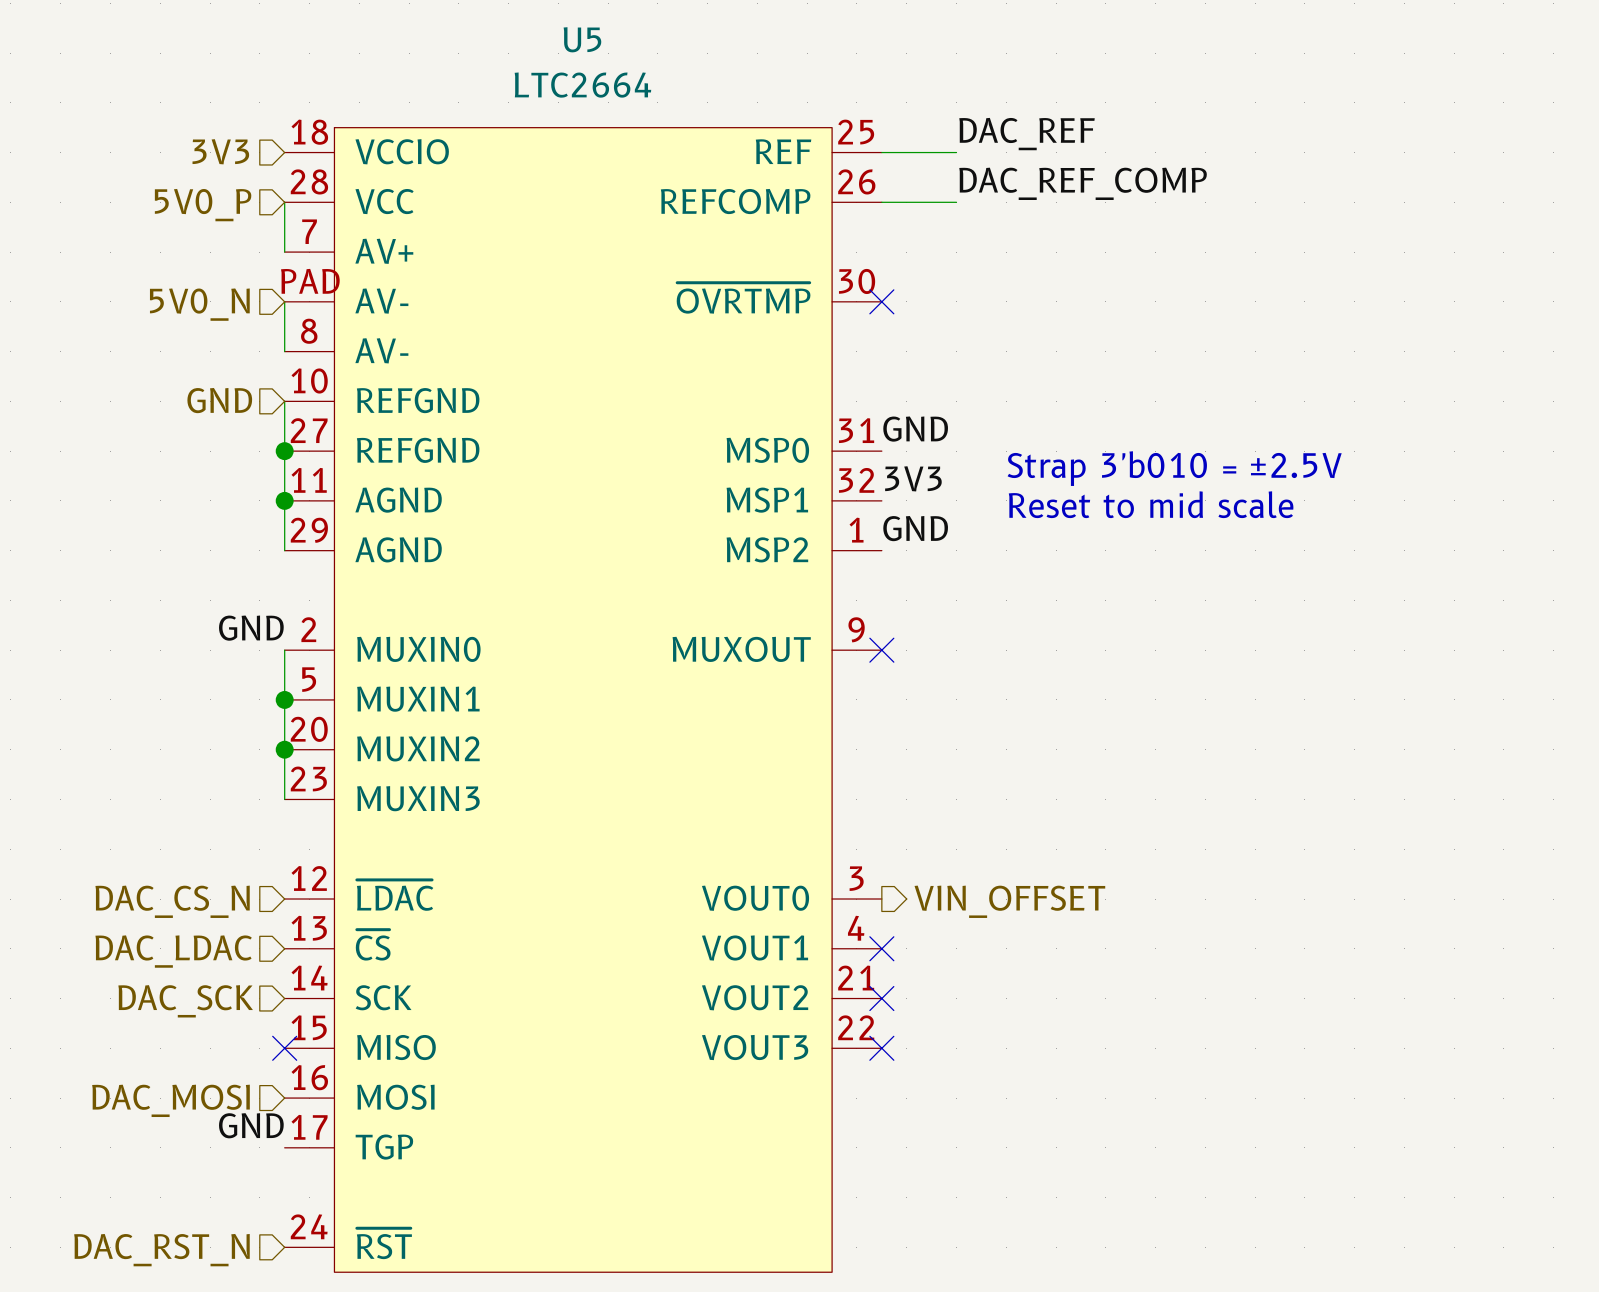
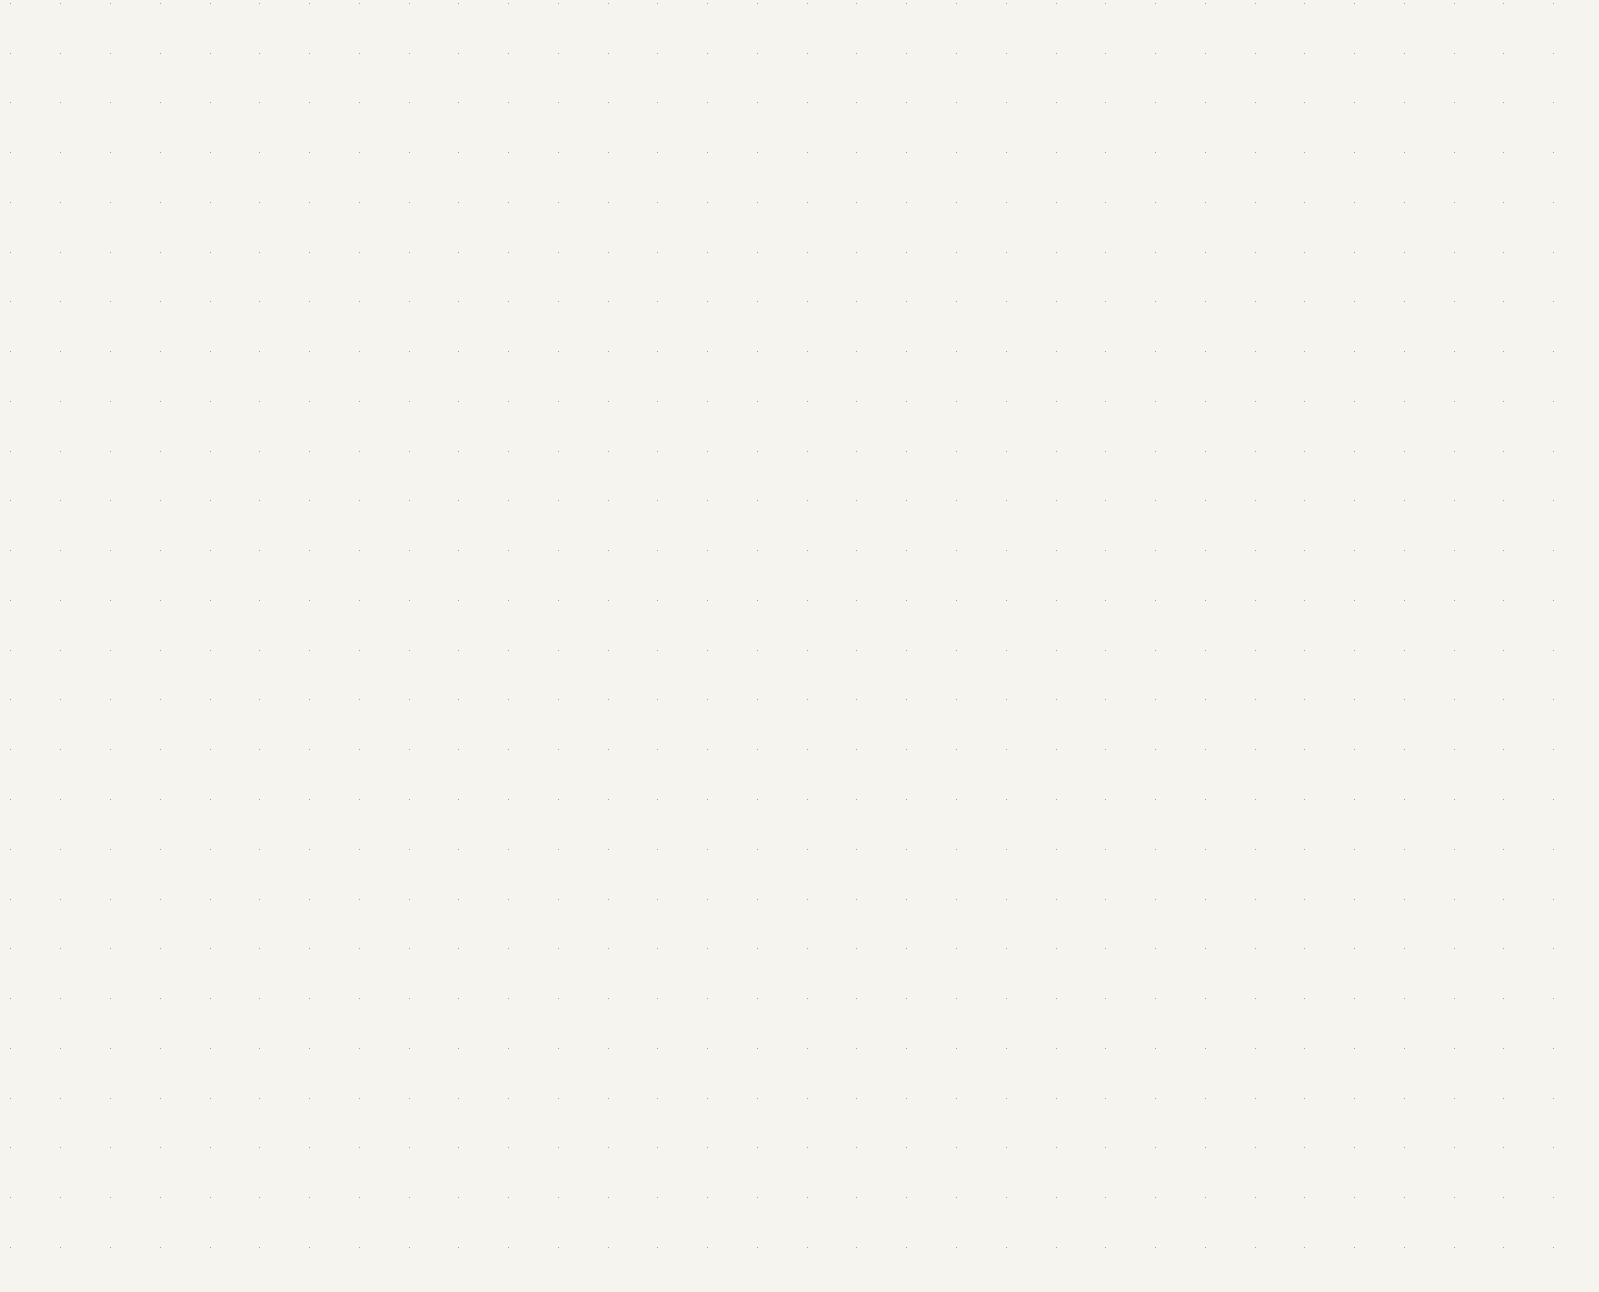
label: DAC_REF (1027, 134) -> none
hierarchical label: 3V3 (220, 151) -> none
wire: (881, 152) (956, 152) -> none
label: DAC_REF_COMP (1083, 183) -> none
wire: (284, 202) (284, 252) -> none
wire: (881, 202) (956, 202) -> none
hierarchical label: 5V0_P (203, 205) -> none
wire: (284, 301) (284, 351) -> none
no-connect mark: (881, 301) -> none
hierarchical label: 5V0_N (199, 304) -> none
hierarchical label: GND (219, 400) -> none
wire: (284, 401) (284, 550) -> none
label: GND (915, 429) -> none
junction: (284, 451) -> none
text: Strap 3'b010 = ±2.5V (1174, 468) -> none
label: 3V3 (913, 478) -> none
junction: (284, 500) -> none
text: Reset to mid scale (1151, 504) -> none
label: GND (915, 528) -> none
label: GND (251, 628) -> none
wire: (284, 650) (284, 799) -> none
no-connect mark: (881, 650) -> none
junction: (284, 699) -> none
U5: LTC2664 (583, 699) -> none
junction: (284, 749) -> none
hierarchical label: DAC_CS_N (172, 901) -> none
hierarchical label: VIN_OFFSET (1009, 901) -> none
no-connect mark: (881, 948) -> none
hierarchical label: DAC_LDAC (173, 951) -> none
no-connect mark: (881, 998) -> none
hierarchical label: DAC_SCK (185, 1001) -> none
no-connect mark: (284, 1048) -> none
no-connect mark: (881, 1048) -> none
hierarchical label: DAC_MOSI (170, 1100) -> none
label: GND (251, 1125) -> none
hierarchical label: DAC_RST_N (161, 1250) -> none

